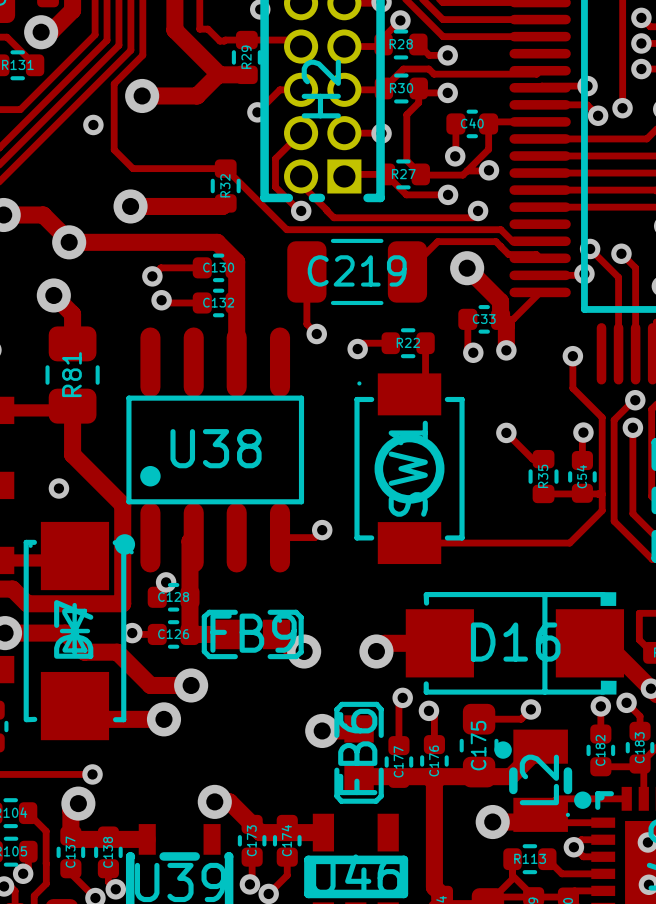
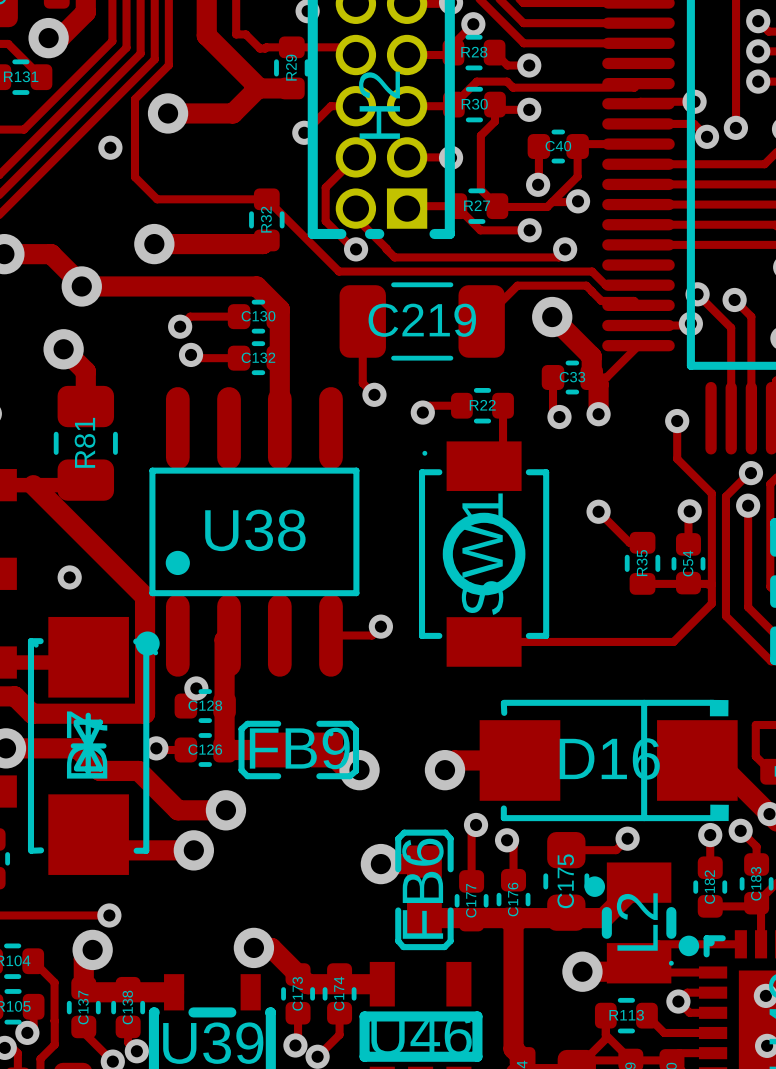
track: (68, 410) (72, 406) (72, 454) -> (33, 485) (85, 537)

